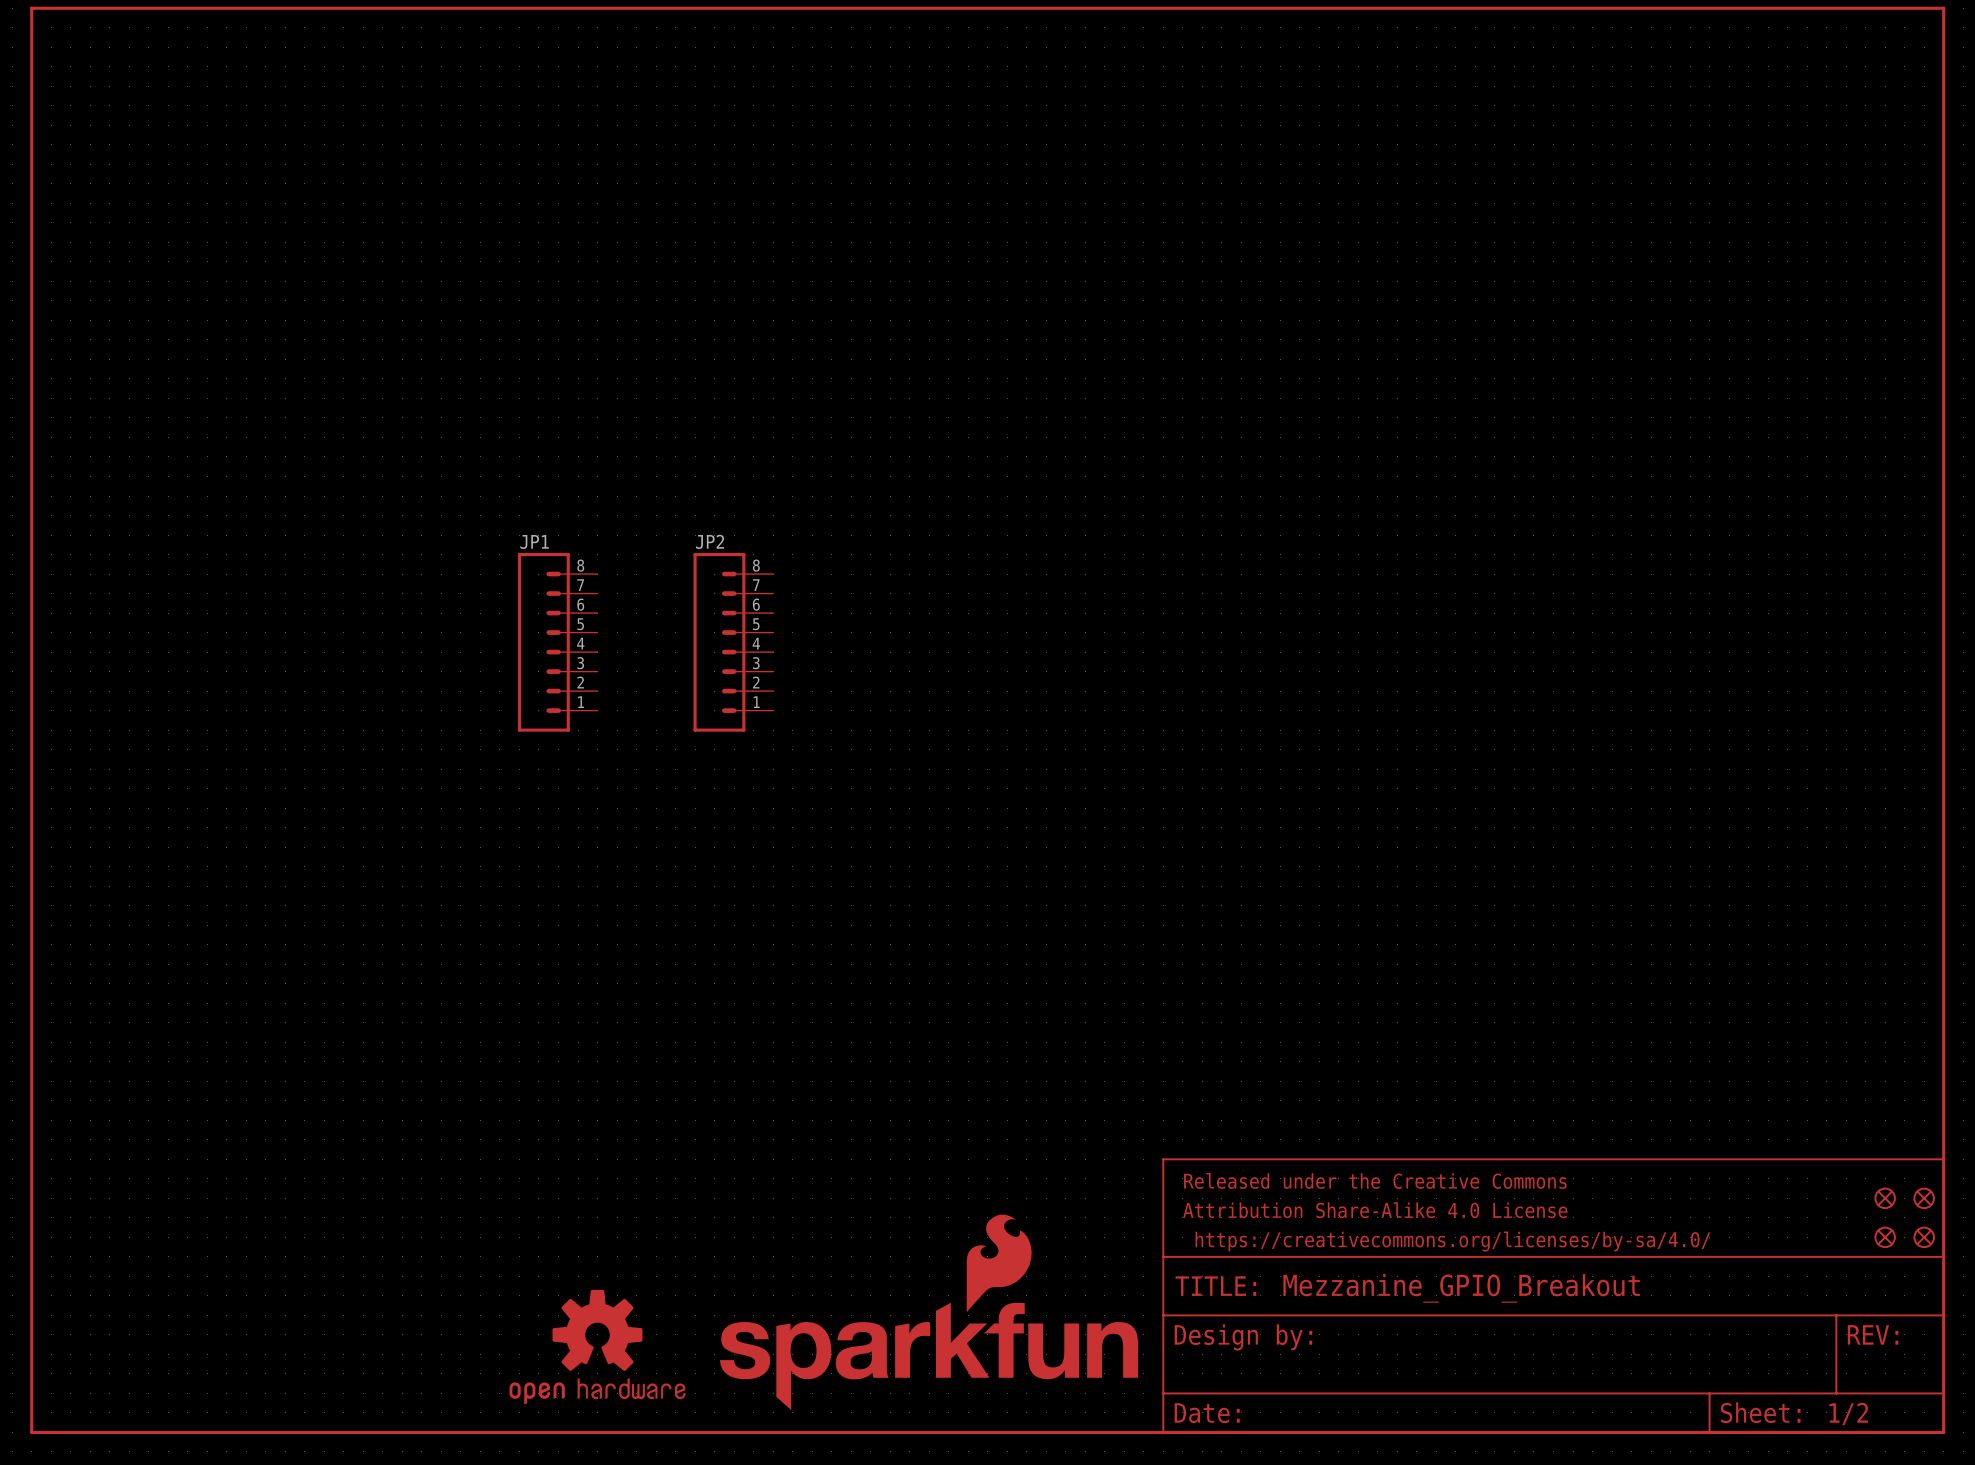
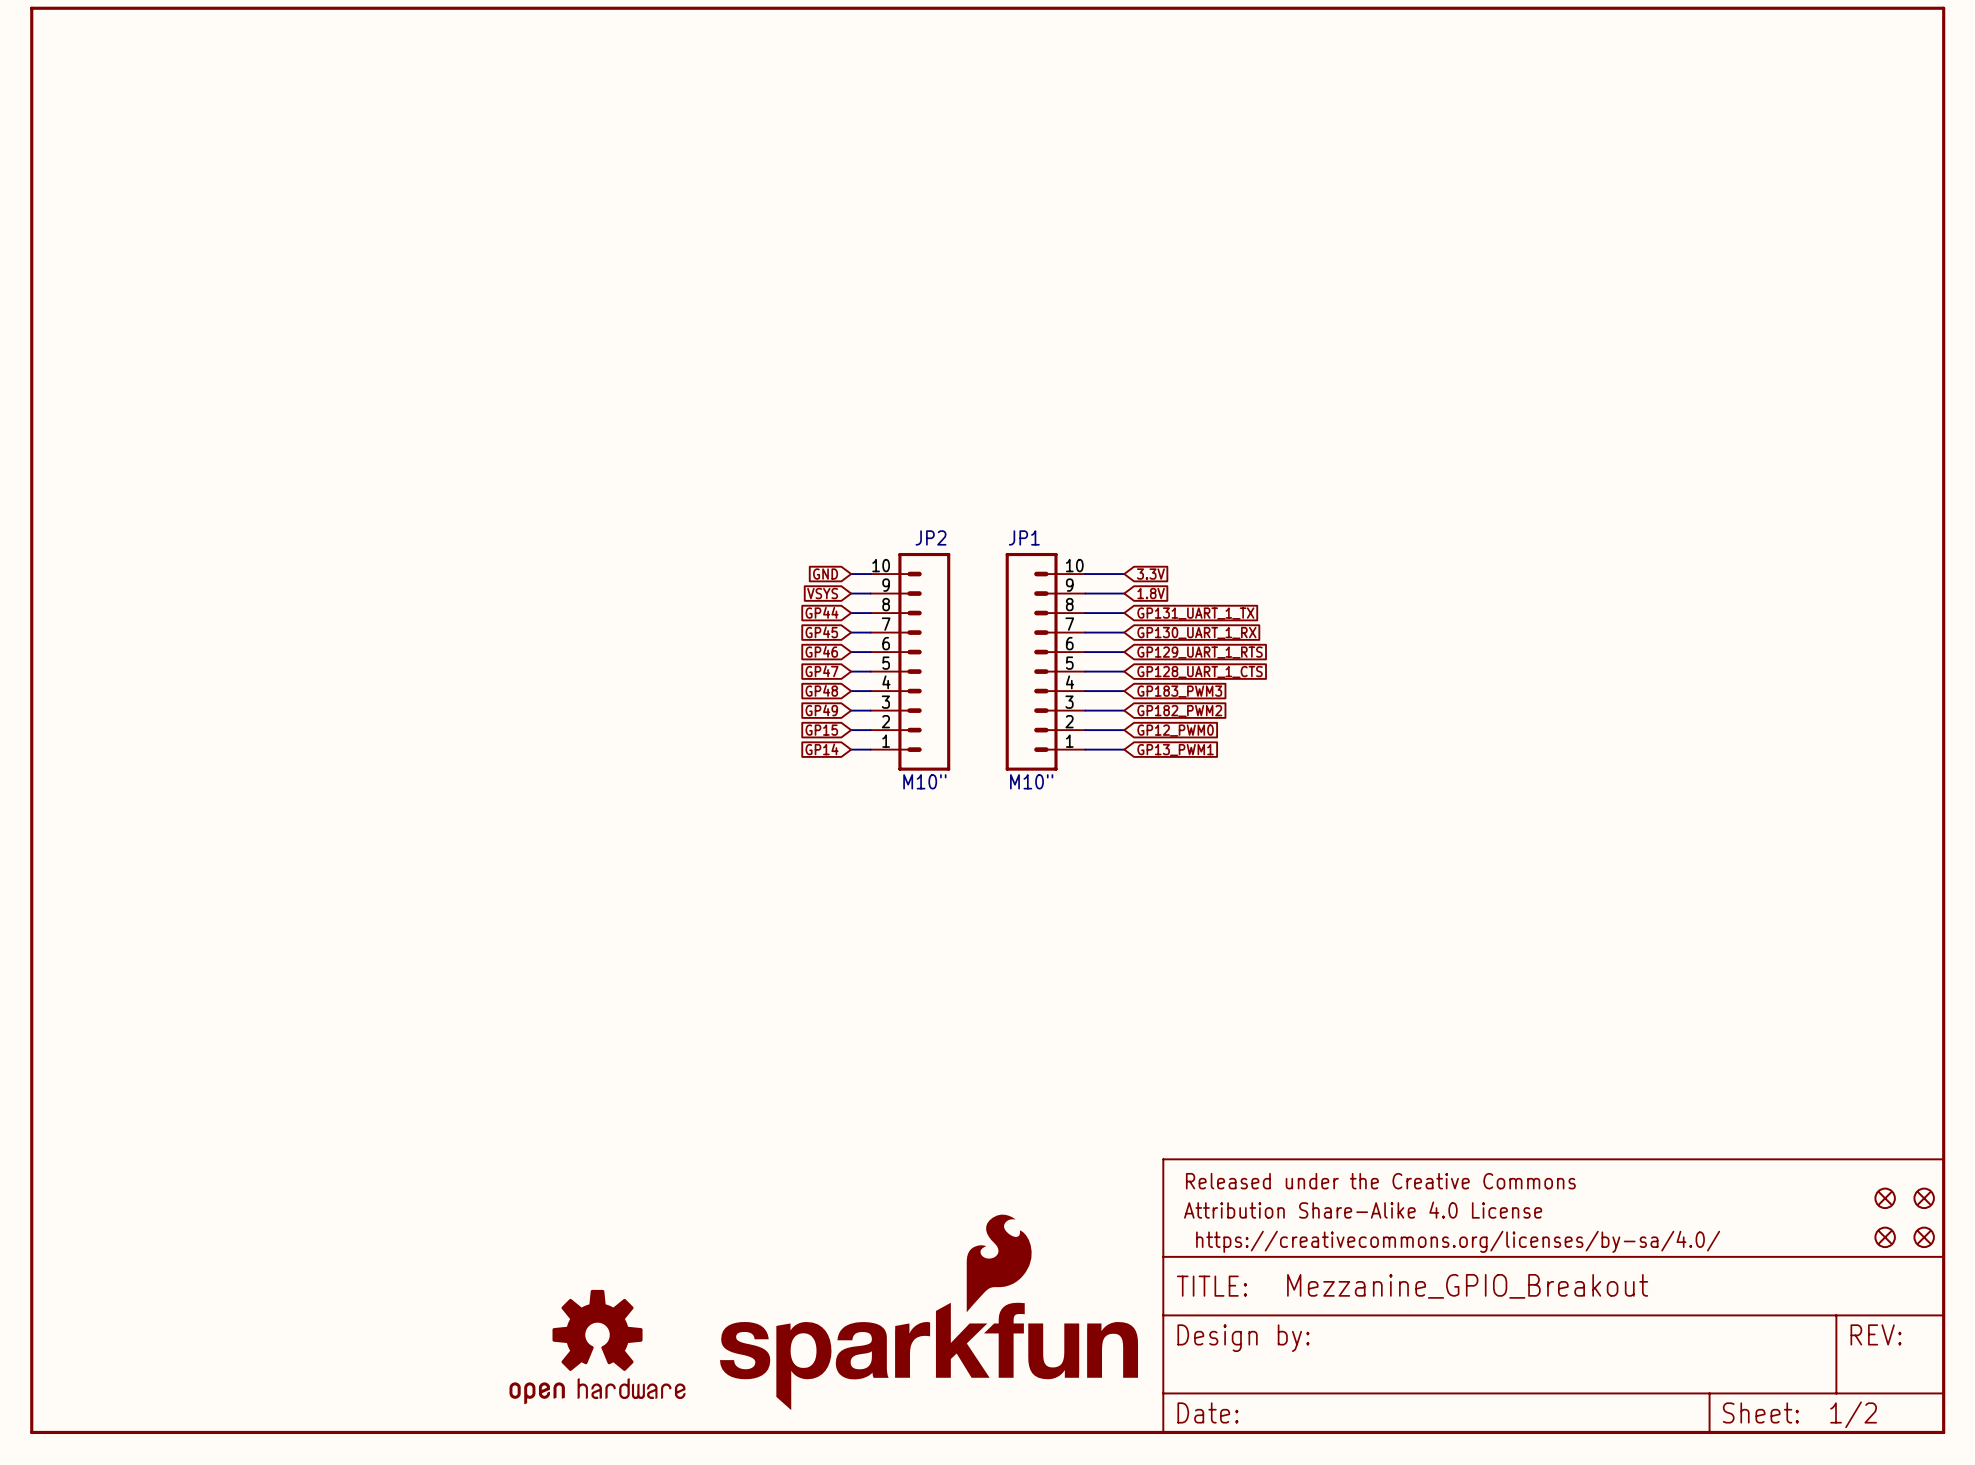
JP1 name position: JP1 (534, 541) -> JP1 (1024, 537)
JP2 name position: JP2 (710, 541) -> JP2 (931, 537)
JP1 symbol: [517, 552, 598, 732] -> [1005, 552, 1086, 771]
JP2 symbol: [693, 552, 774, 732] -> [870, 552, 951, 771]
global label: none -> GND (825, 574)
wire: none -> (851, 574) (870, 574)
wire: none -> (1085, 574) (1124, 574)
global label: none -> 3.3V (1150, 574)
global label: none -> VSYS (822, 593)
wire: none -> (851, 593) (870, 593)
wire: none -> (1085, 593) (1124, 593)
global label: none -> 1.8V (1151, 593)
global label: none -> GP44 (822, 612)
wire: none -> (851, 613) (870, 613)
wire: none -> (1085, 613) (1124, 613)
global label: none -> GP131_UART_1_TX (1195, 613)
global label: none -> GP45 (821, 632)
wire: none -> (851, 632) (870, 632)
wire: none -> (1085, 632) (1124, 632)
global label: none -> GP130_UART_1_RX (1196, 633)
global label: none -> GP46 (821, 651)
wire: none -> (851, 652) (870, 652)
wire: none -> (1085, 652) (1124, 652)
global label: none -> GP129_UART_1_RTS (1200, 652)
global label: none -> GP47 (822, 671)
wire: none -> (851, 671) (870, 671)
wire: none -> (1085, 671) (1124, 671)
global label: none -> GP128_UART_1_CTS (1200, 672)
global label: none -> GP48 (821, 690)
wire: none -> (851, 691) (870, 691)
wire: none -> (1085, 691) (1124, 691)
global label: none -> GP183_PWM3 (1179, 691)
global label: none -> GP49 (821, 710)
wire: none -> (851, 710) (870, 710)
wire: none -> (1085, 710) (1124, 710)
global label: none -> GP182_PWM2 (1179, 711)
global label: none -> GP15 (821, 730)
wire: none -> (851, 730) (870, 730)
wire: none -> (1085, 730) (1124, 730)
global label: none -> GP12_PWM0 (1175, 730)
global label: none -> GP14 (822, 749)
wire: none -> (851, 749) (870, 749)
wire: none -> (1085, 749) (1124, 749)
global label: none -> GP13_PWM1 (1175, 750)
JP2 value: none -> M10" (924, 781)
JP1 value: none -> M10" (1031, 781)

